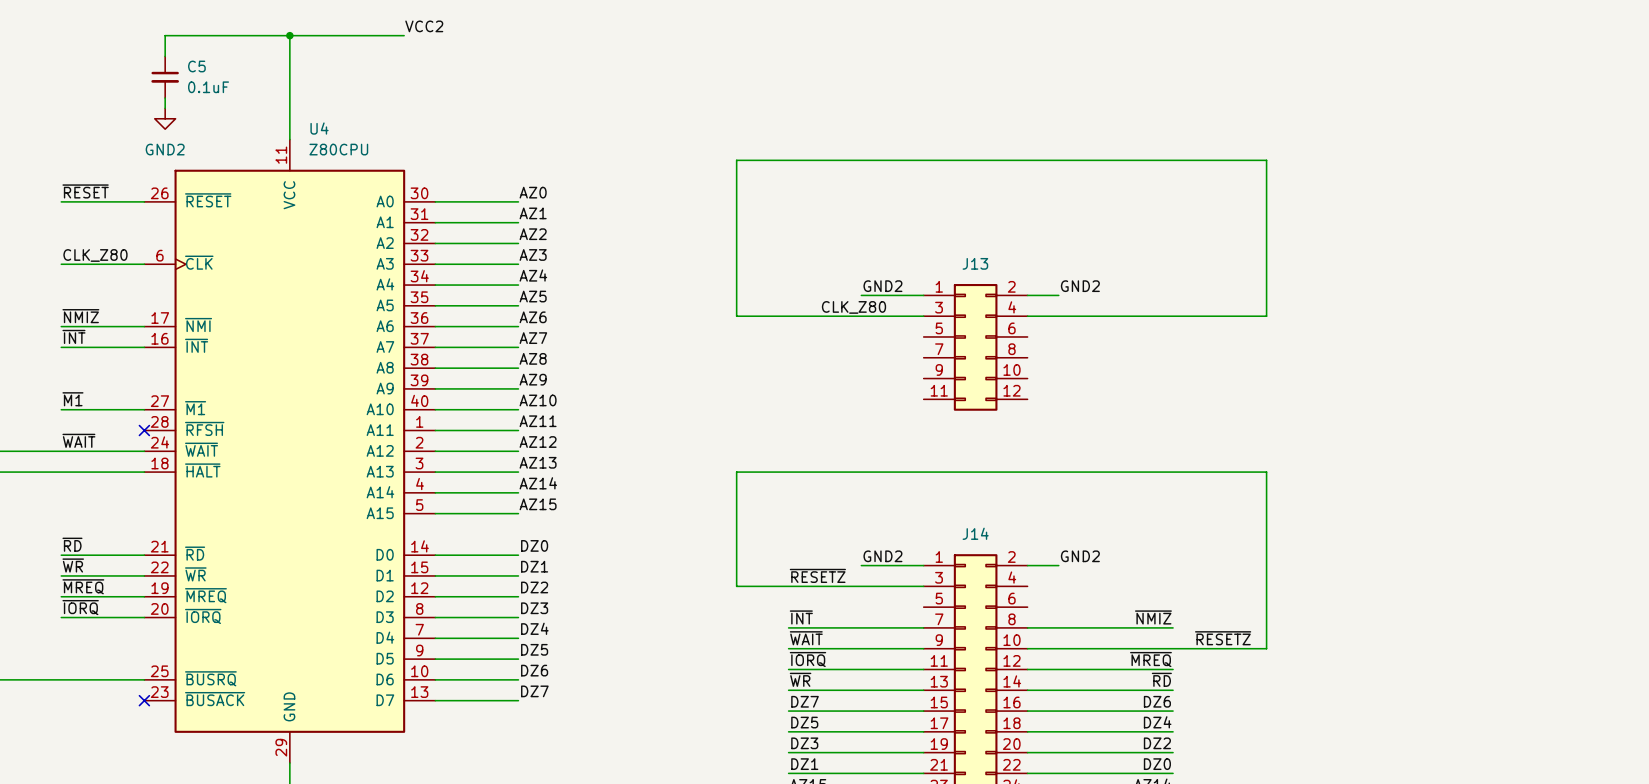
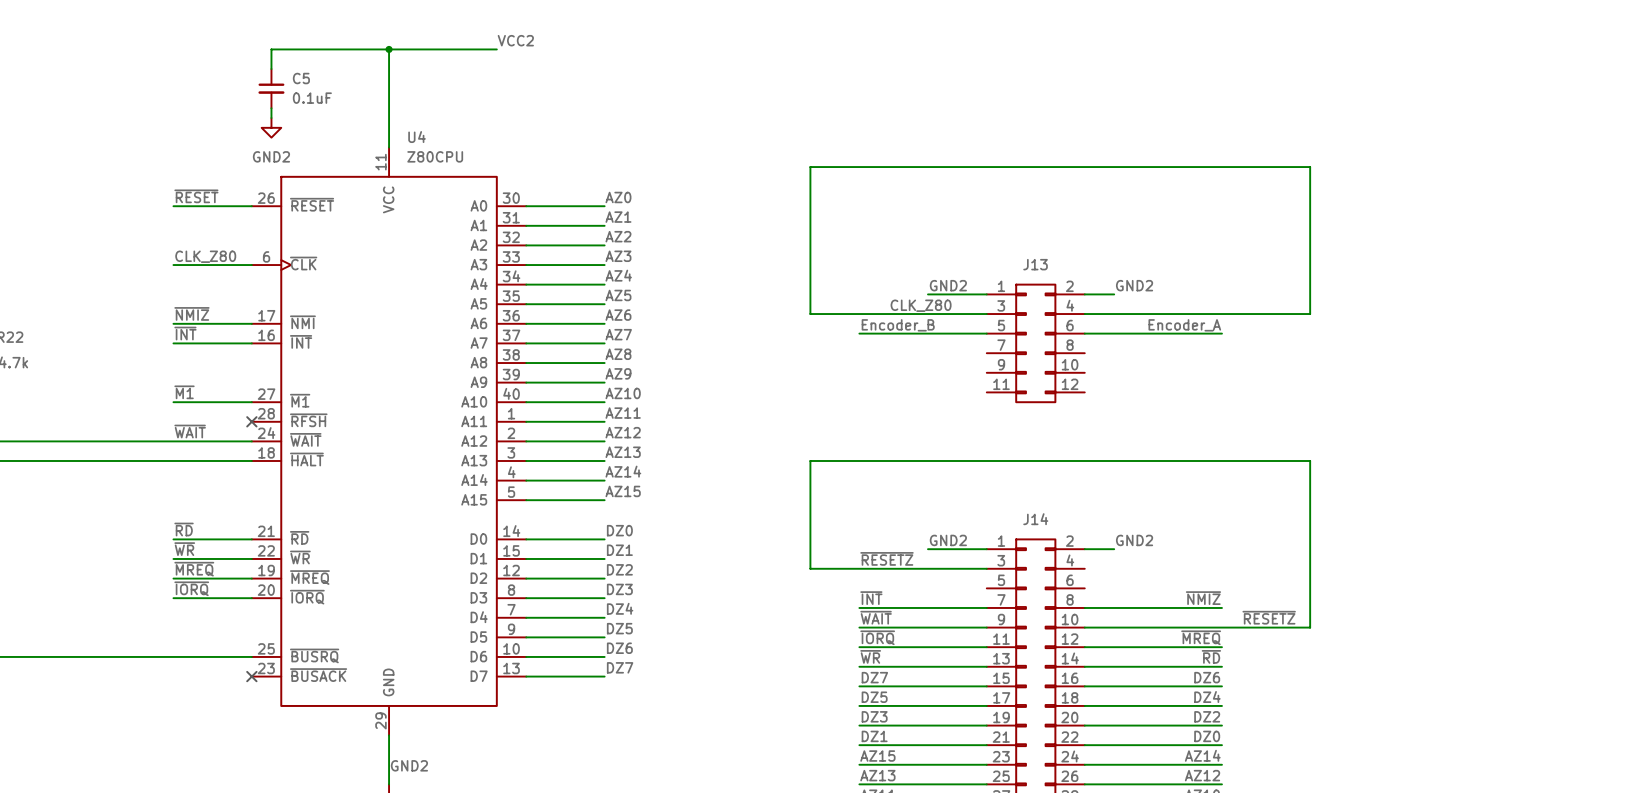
label: none -> Encoder_B (898, 325)
label: none -> Encoder_A (1184, 325)
wire: none -> (859, 333) (986, 333)
wire: none -> (1084, 333) (1221, 333)

